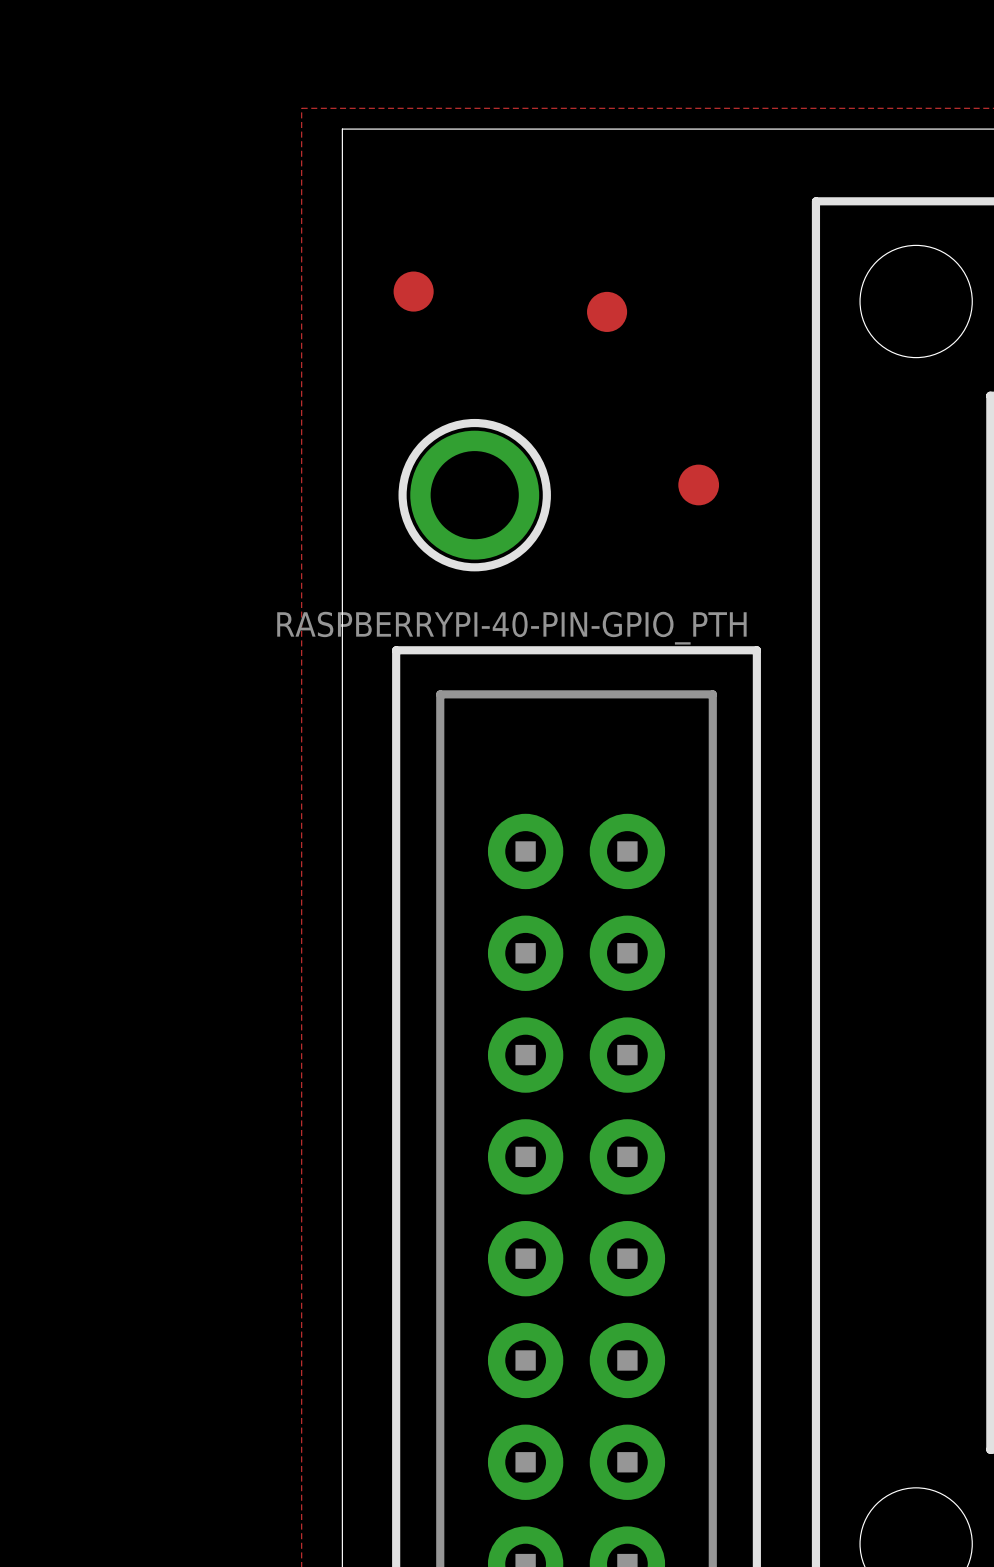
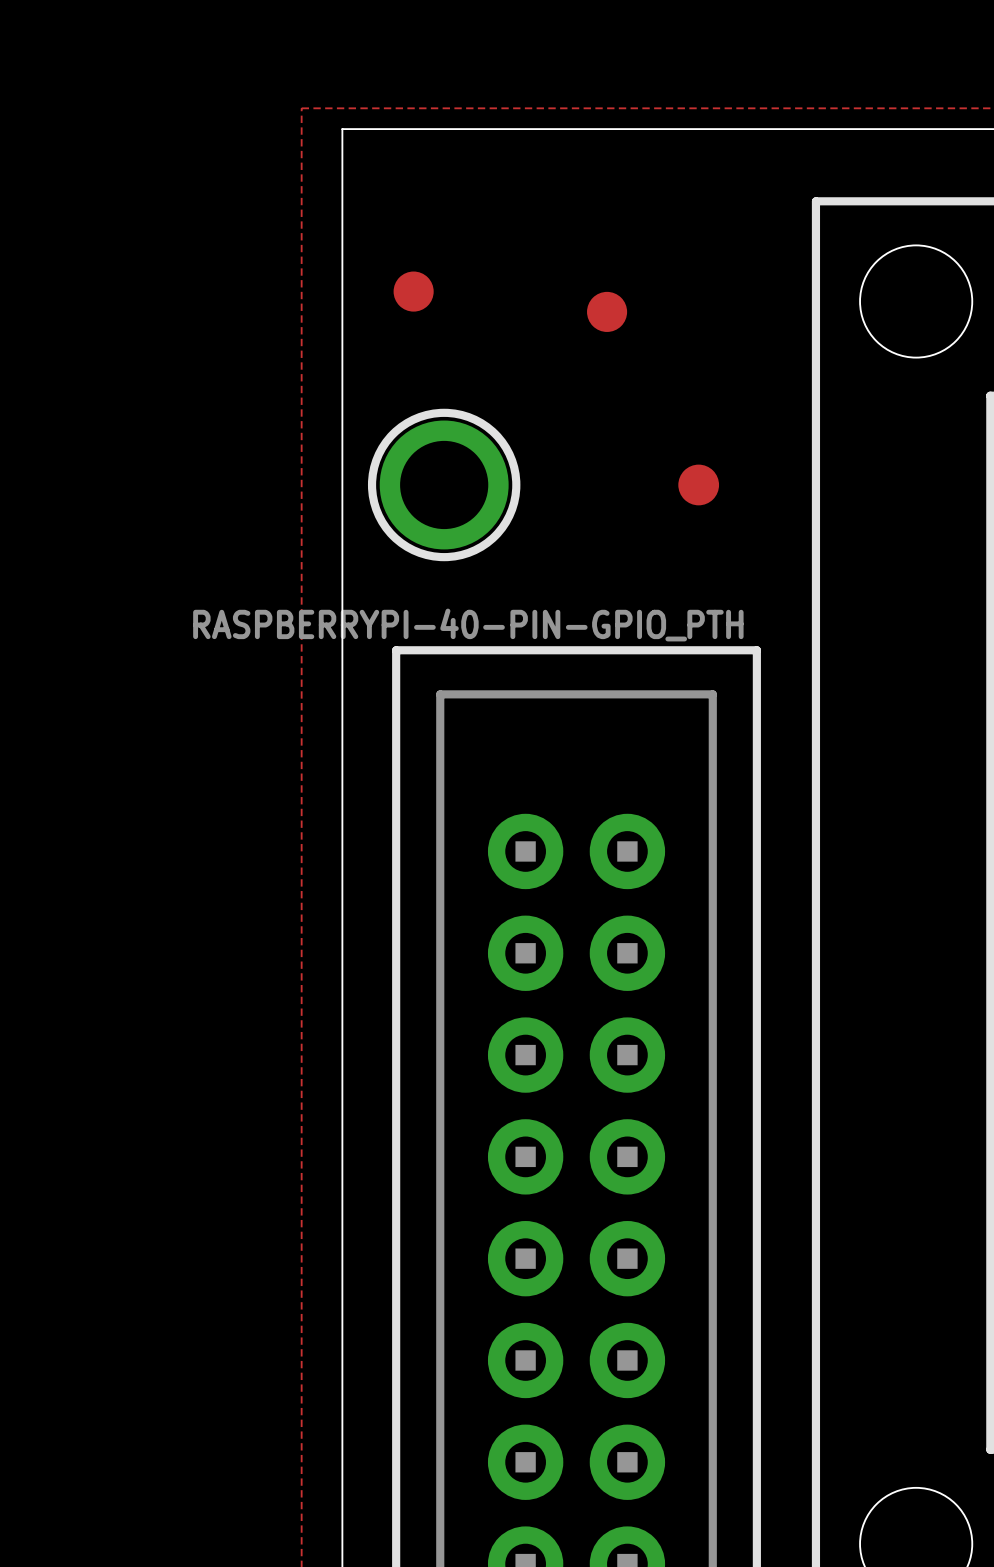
part position: (474, 495) -> (444, 484)

